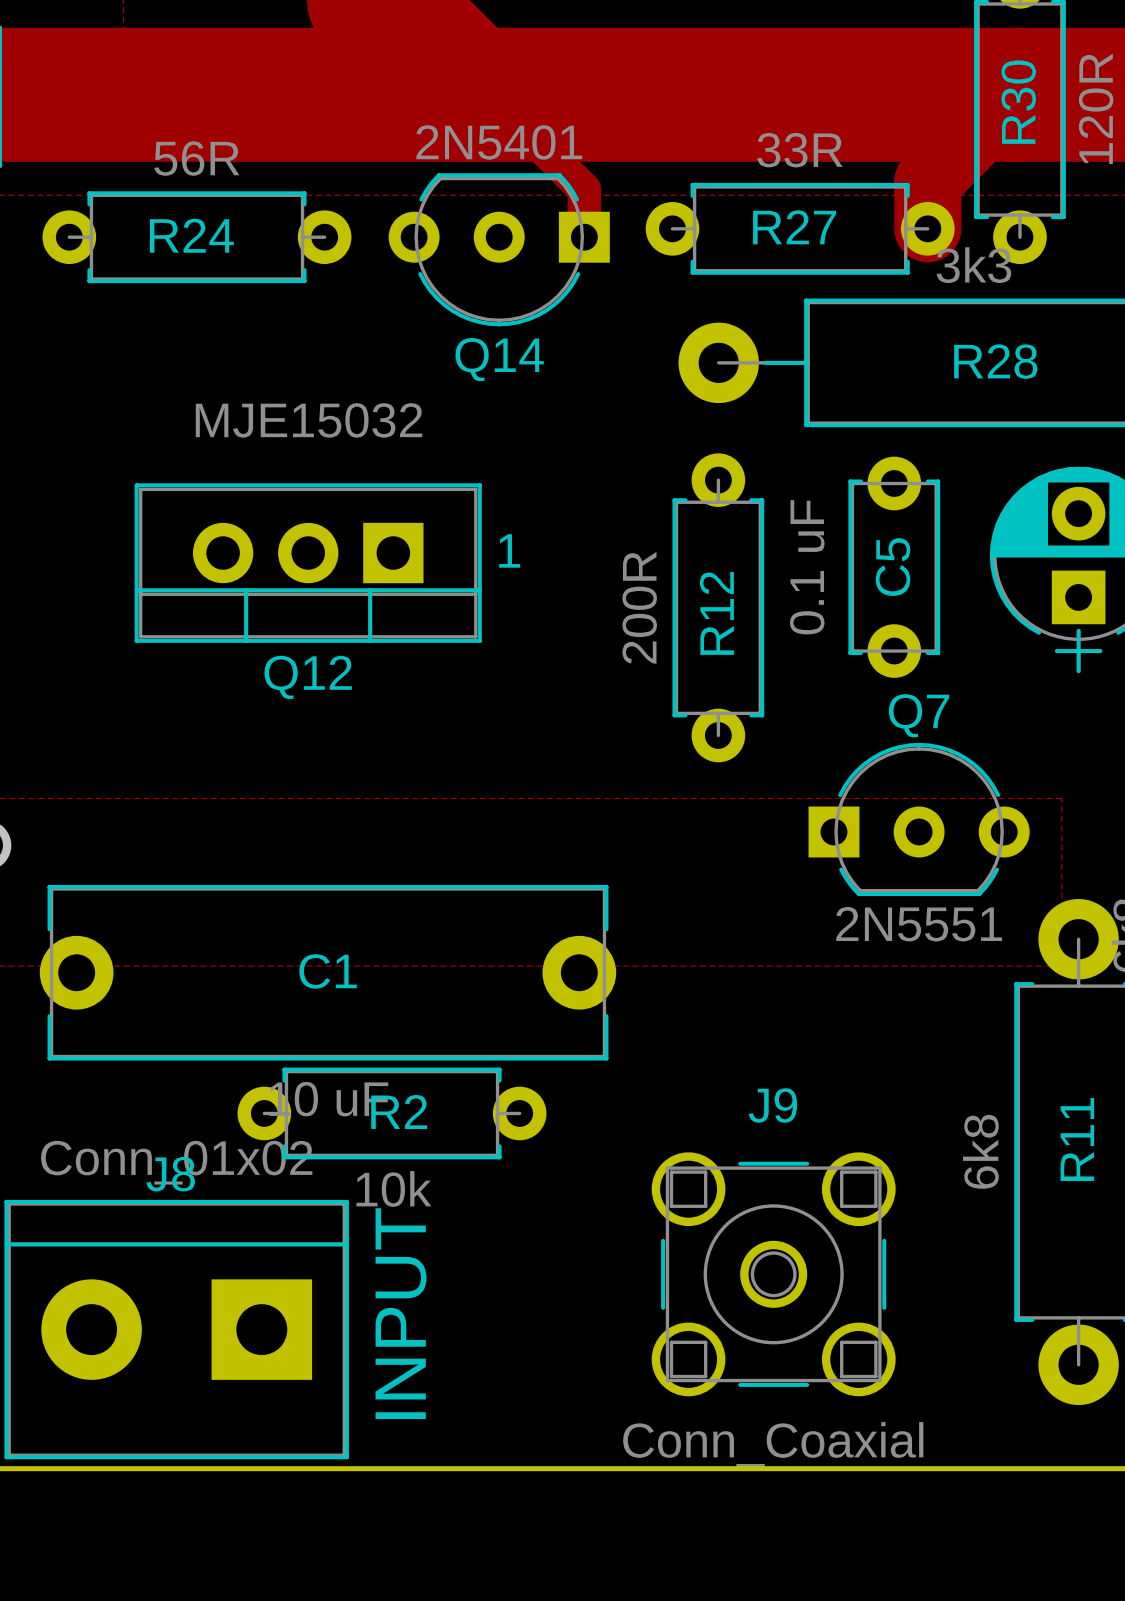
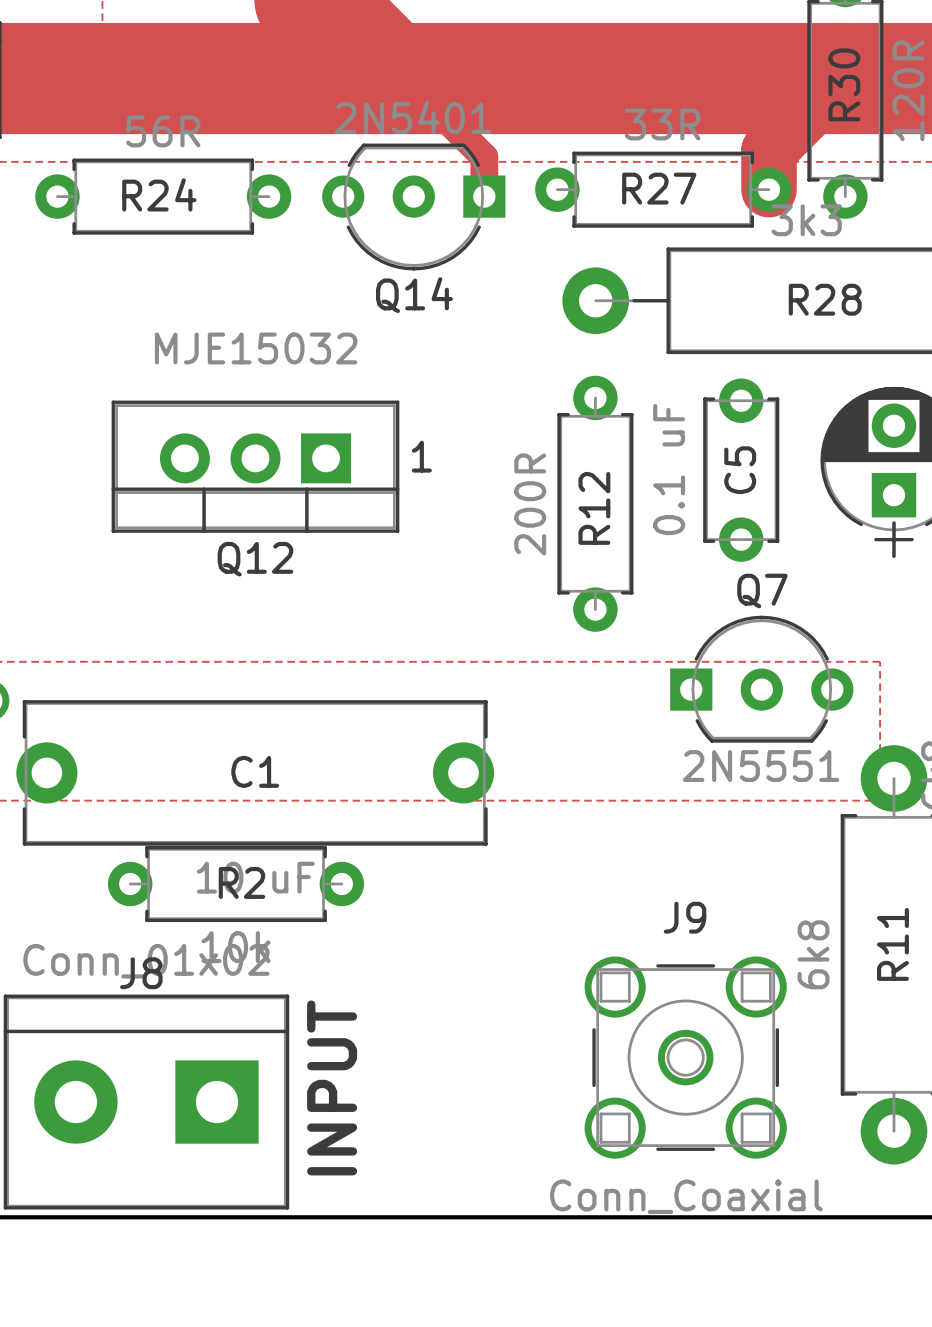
C1 position: (328, 972) -> (255, 772)
R2 position: (392, 1113) -> (236, 884)
J9 position: (773, 1274) -> (685, 1057)

